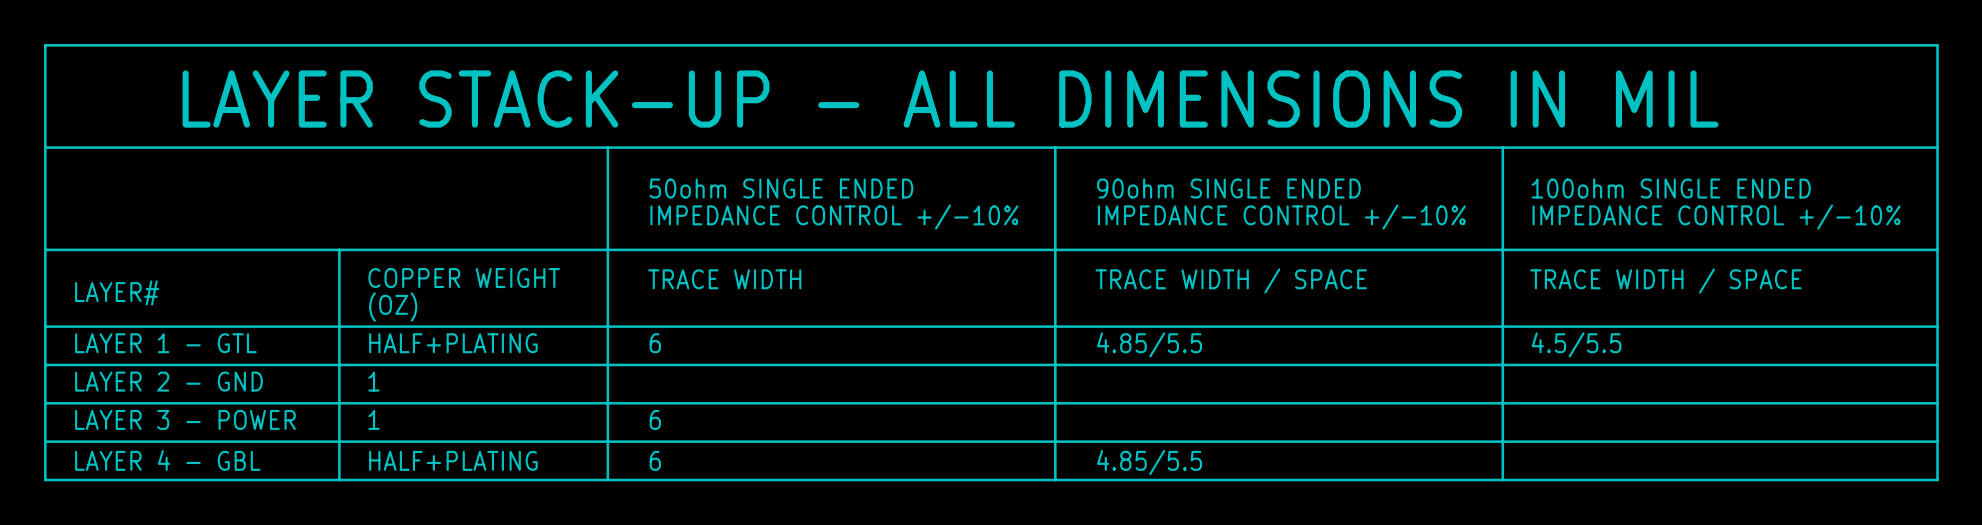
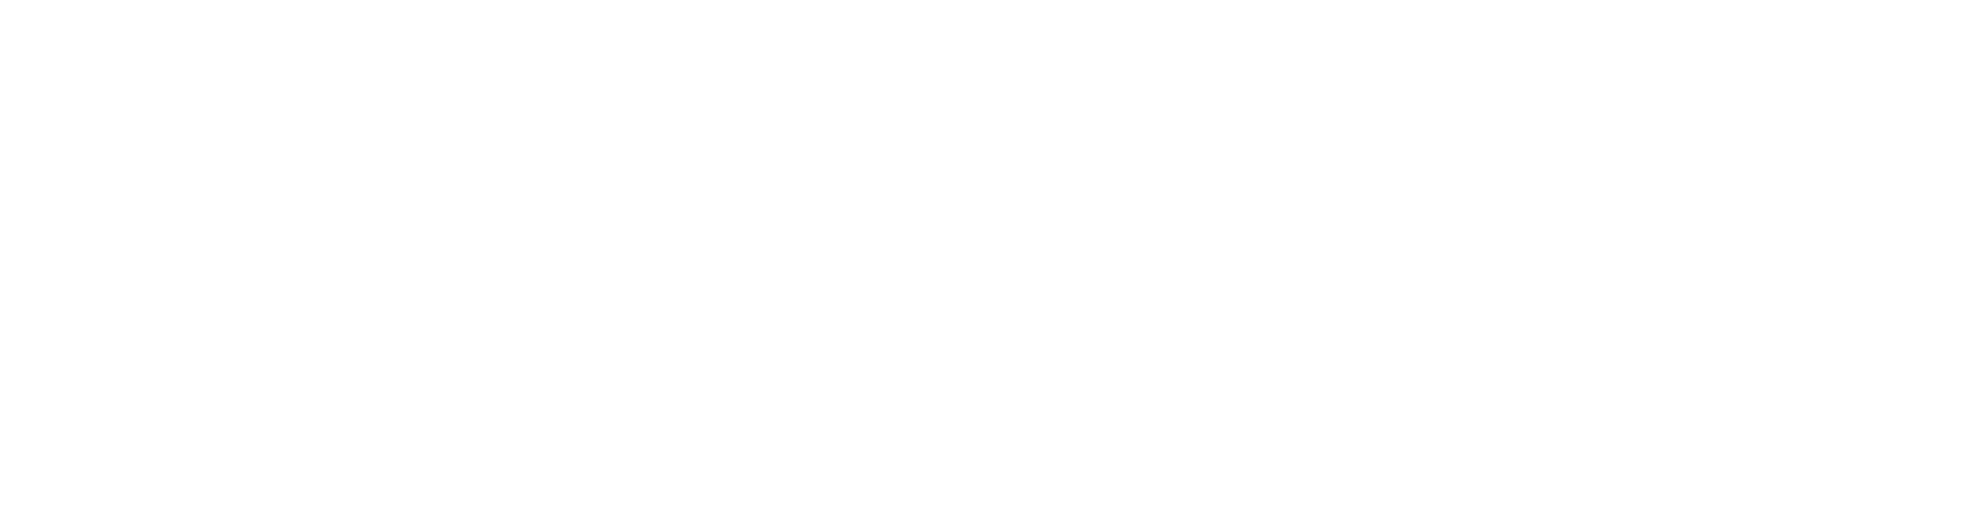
line: (45, 45) (1937, 45) (1937, 480) (45, 480) (45, 45) -> none
text: LAYER STACK-UP - ALL DIMENSIONS IN MIL (950, 99) -> none
line: (45, 147) (1937, 147) -> none
line: (607, 147) (607, 480) -> none
line: (1055, 147) (1055, 480) -> none
line: (1502, 147) (1502, 480) -> none
text: 50ohm SINGLE ENDED (781, 188) -> none
text: 90ohm SINGLE ENDED (1228, 188) -> none
text: 100ohm SINGLE ENDED (1671, 188) -> none
text: IMPEDANCE CONTROL +/-10% (834, 217) -> none
text: IMPEDANCE CONTROL +/-10% (1281, 217) -> none
text: IMPEDANCE CONTROL +/-10% (1716, 217) -> none
line: (45, 249) (1937, 249) -> none
line: (339, 249) (339, 480) -> none
text: COPPER WEIGHT (464, 278) -> none
text: TRACE WIDTH (724, 279) -> none
text: TRACE WIDTH / SPACE (1231, 281) -> none
text: TRACE WIDTH / SPACE (1665, 281) -> none
text: LAYER# (117, 292) -> none
text: (OZ) (393, 306) -> none
line: (45, 326) (1937, 326) -> none
text: LAYER 1 - GTL (165, 343) -> none
text: HALF+PLATING (453, 343) -> none
text: 6 (655, 343) -> none
text: 4.85/5.5 (1149, 344) -> none
text: 4.5/5.5 (1576, 344) -> none
line: (45, 364) (1937, 364) -> none
text: LAYER 2 - GND (168, 381) -> none
text: 1 (374, 381) -> none
line: (45, 403) (1937, 403) -> none
text: LAYER 3 - POWER (185, 419) -> none
text: 1 (374, 419) -> none
text: 6 (655, 419) -> none
line: (45, 441) (1937, 441) -> none
text: LAYER 4 - GBL (167, 460) -> none
text: HALF+PLATING (453, 460) -> none
text: 6 (655, 460) -> none
text: 4.85/5.5 (1149, 462) -> none

